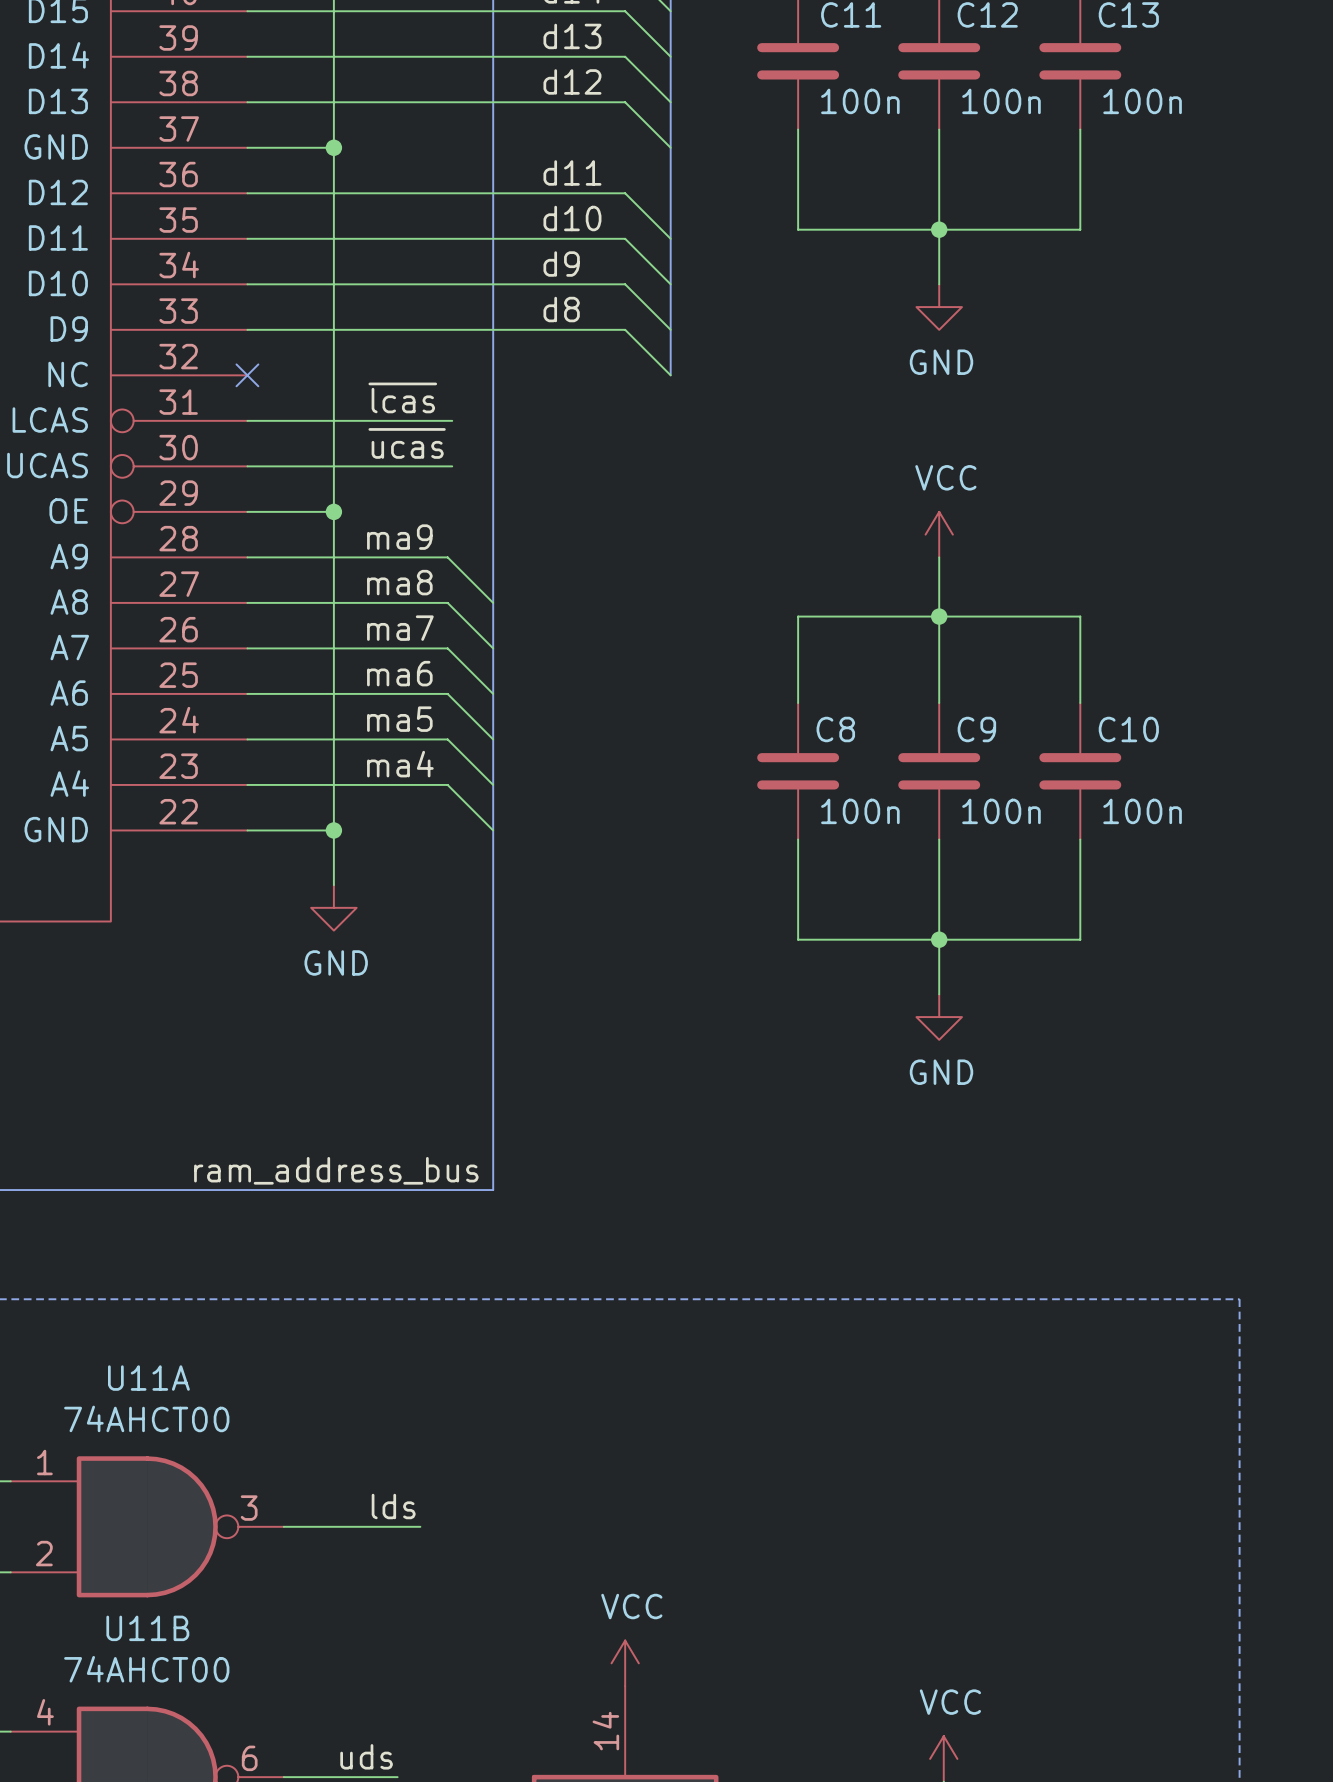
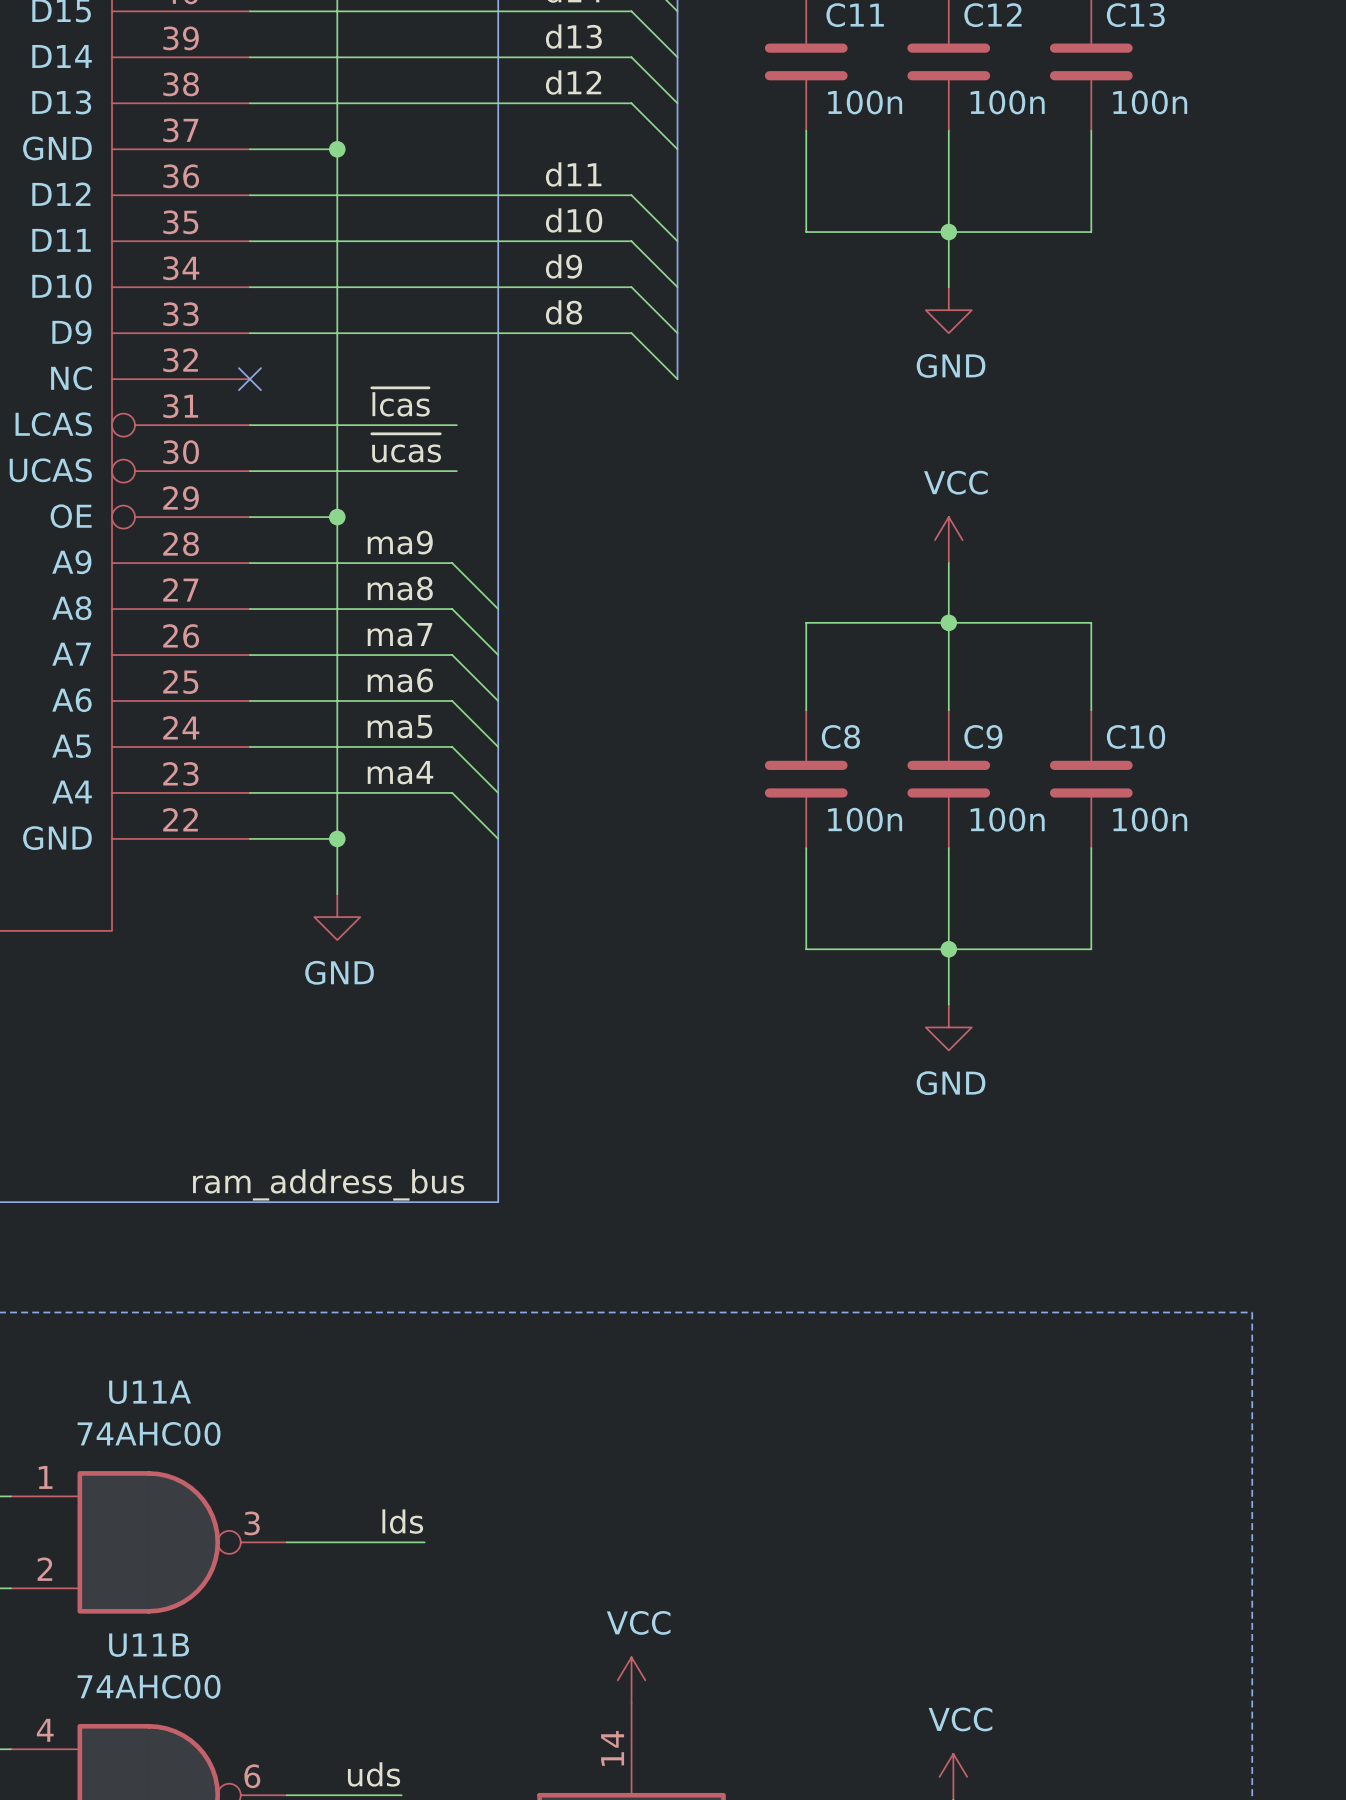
U11A value: 74AHCT00 (146, 1418) -> 74AHC00 (149, 1433)
U11B value: 74AHCT00 (146, 1669) -> 74AHC00 (149, 1686)

